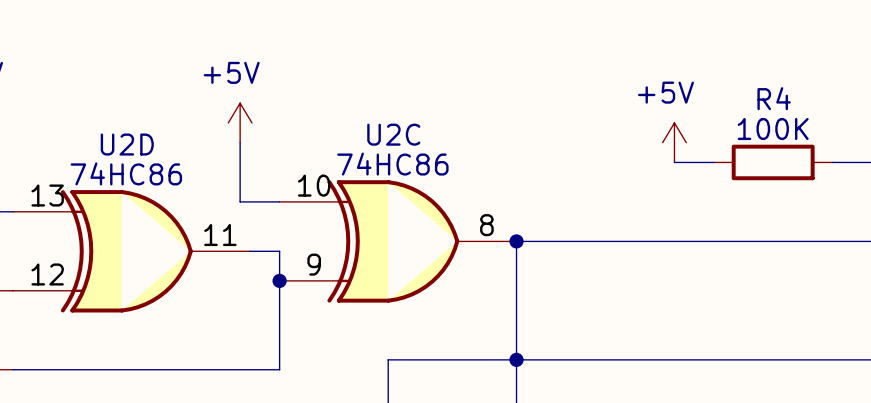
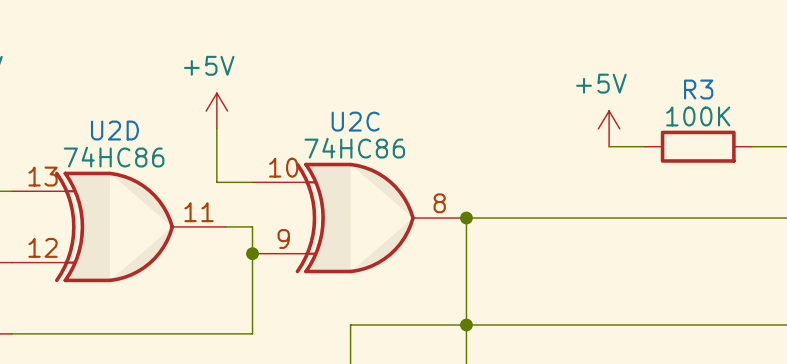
R4 name: R4 (774, 98) -> R3 (698, 89)

